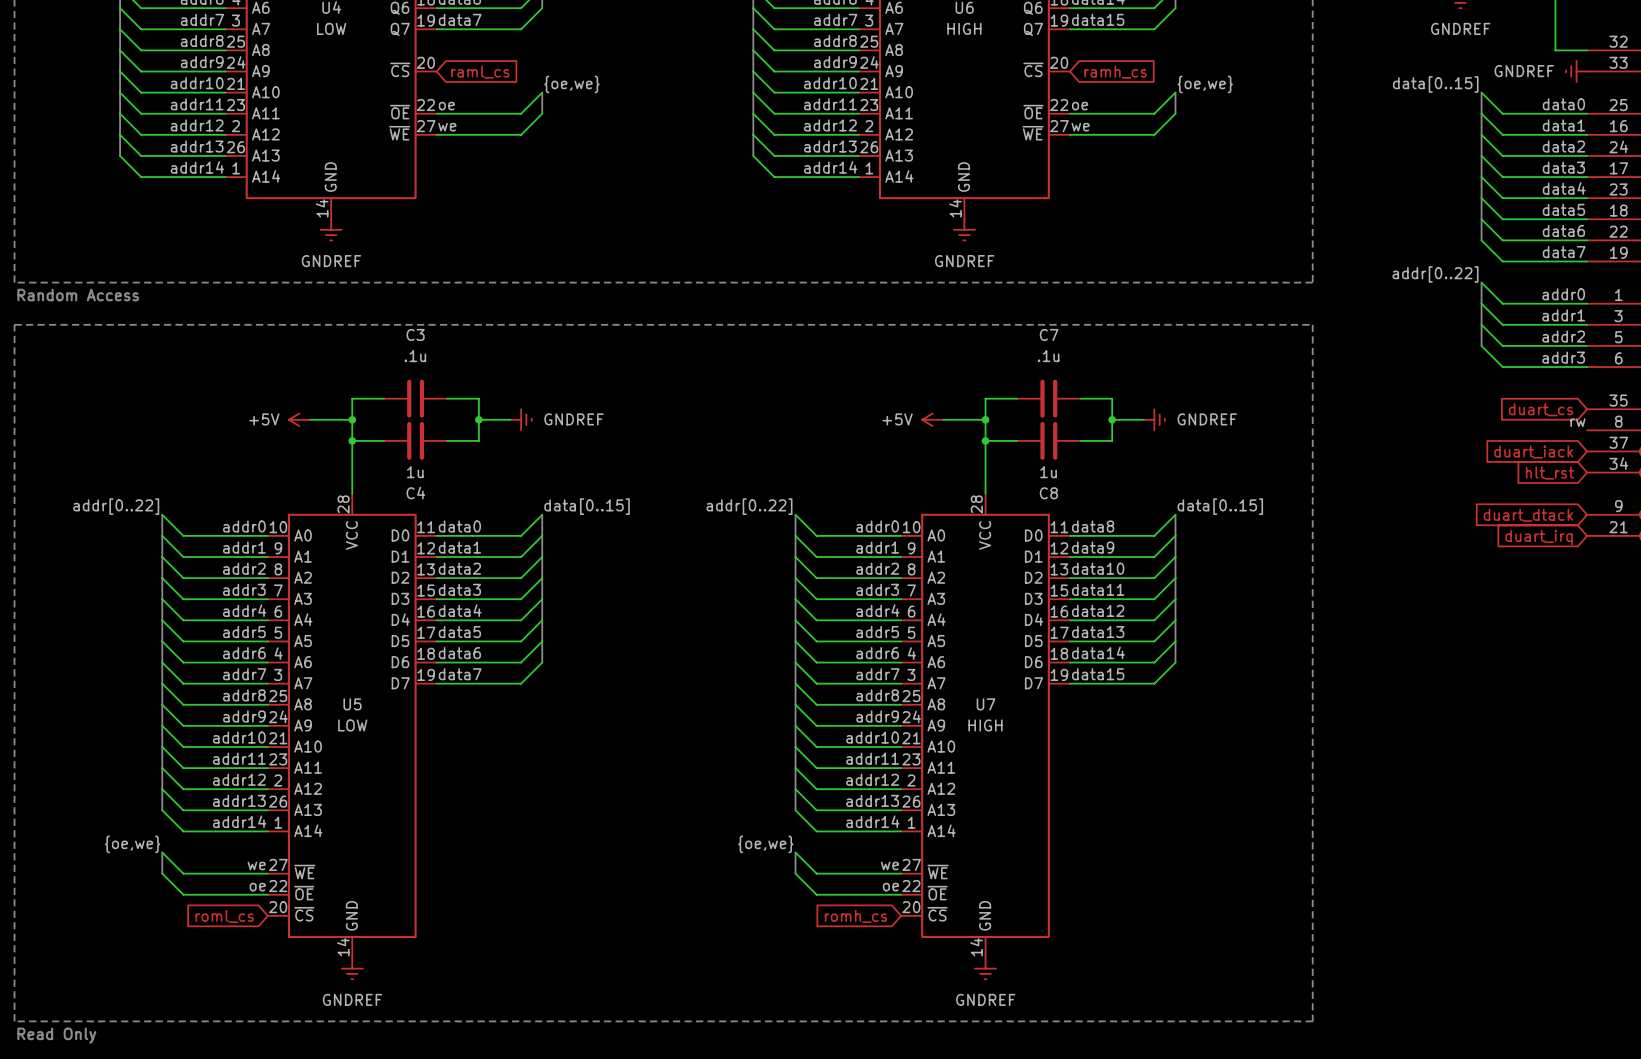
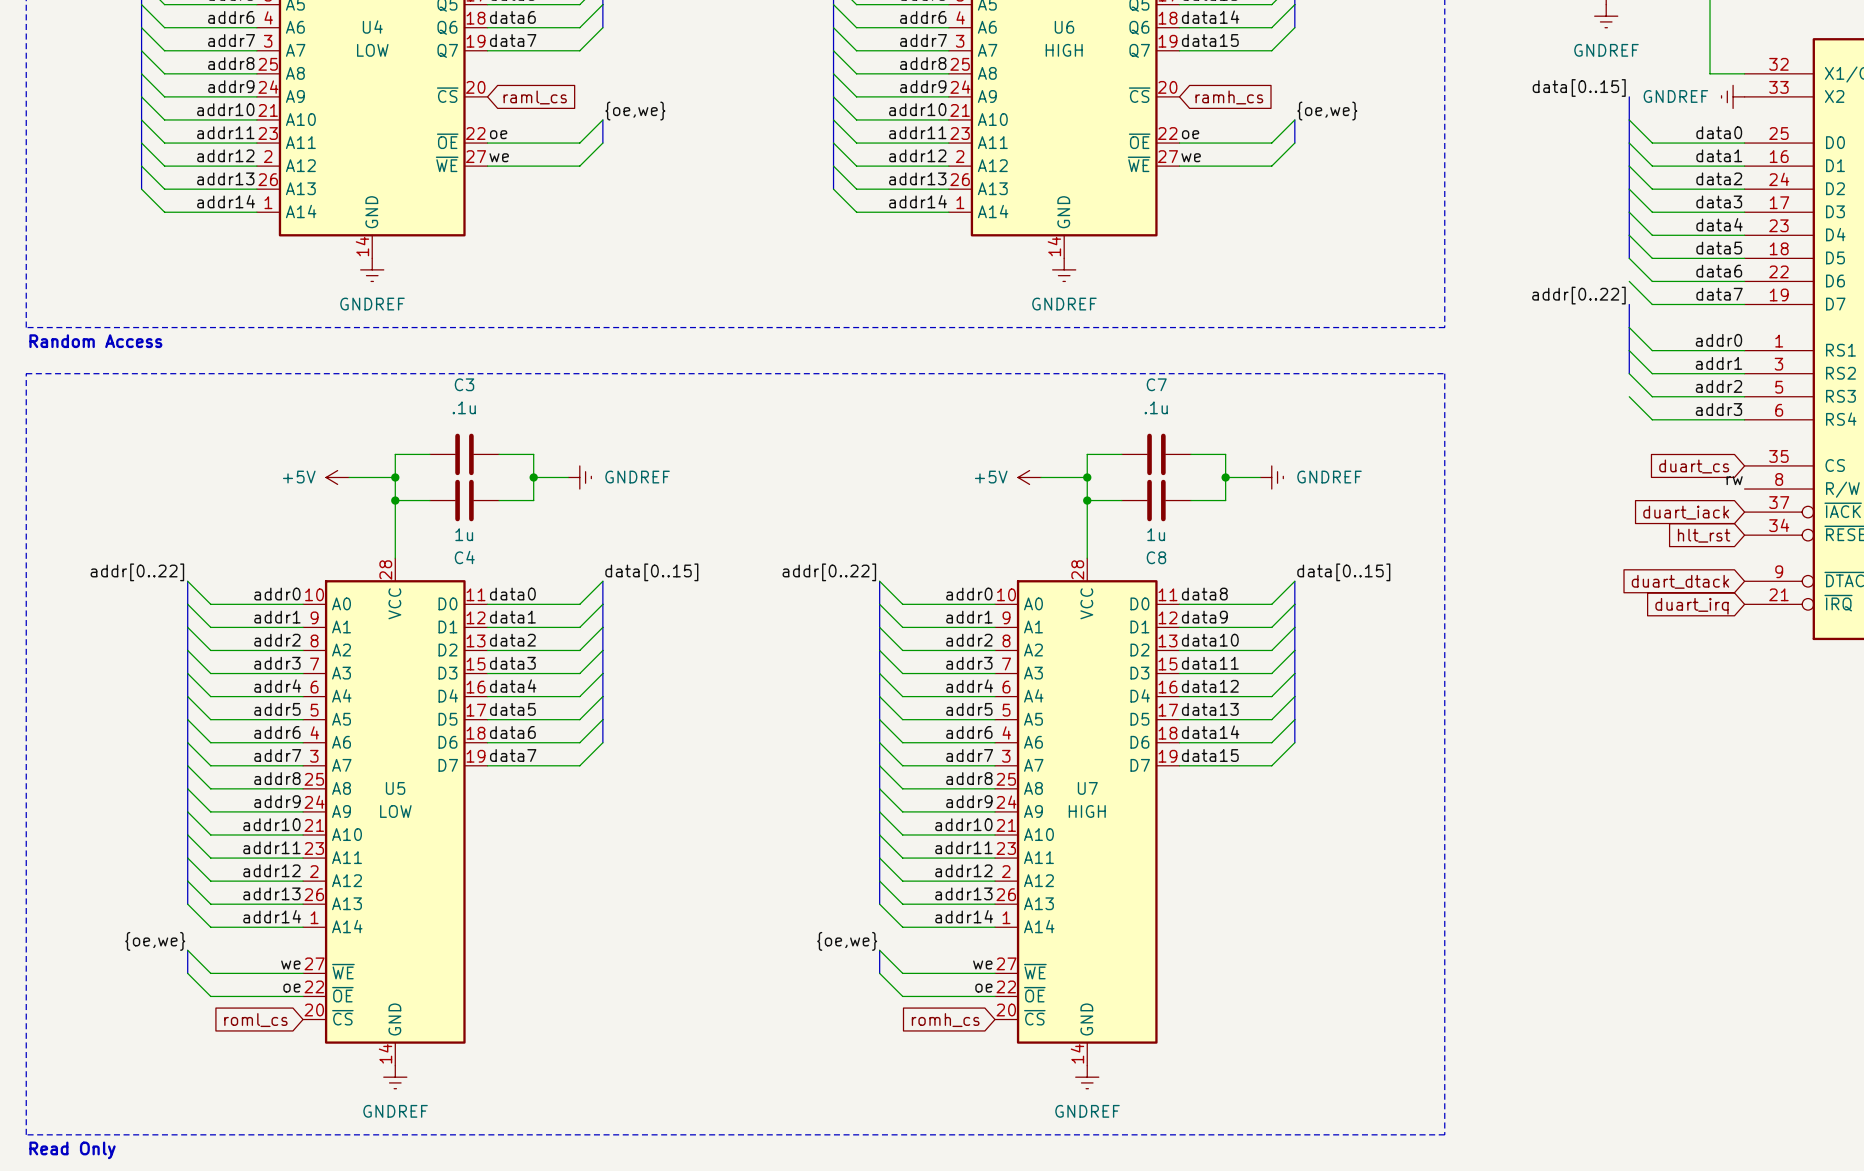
bus: none -> (1629, 96) (1629, 119)
label position: data[0..15] (1435, 84) -> data[0..15] (1579, 87)
bus: (1481, 219) (1481, 240) -> (1629, 304) (1629, 327)
label position: addr[0..22] (1435, 274) -> addr[0..22] (1578, 295)
bus: (1481, 324) (1481, 345) -> none

